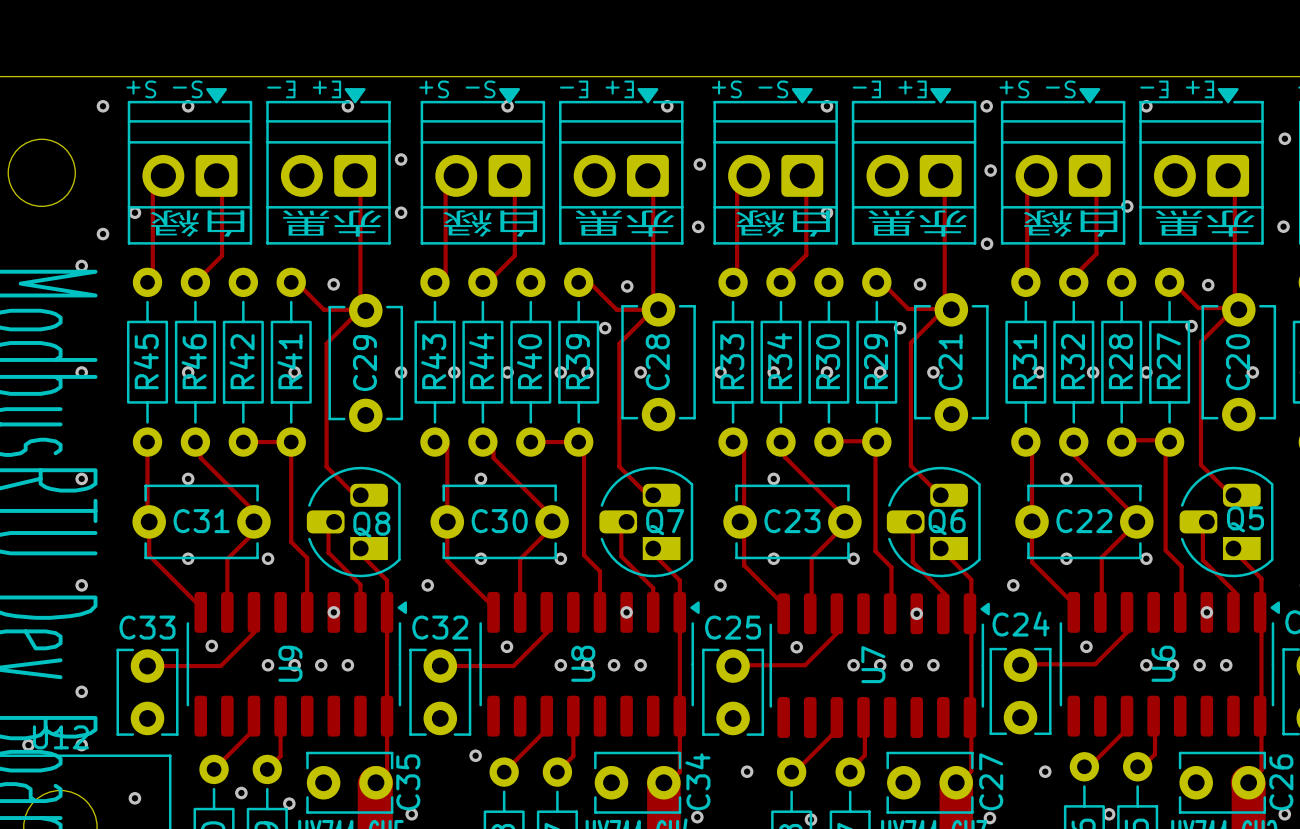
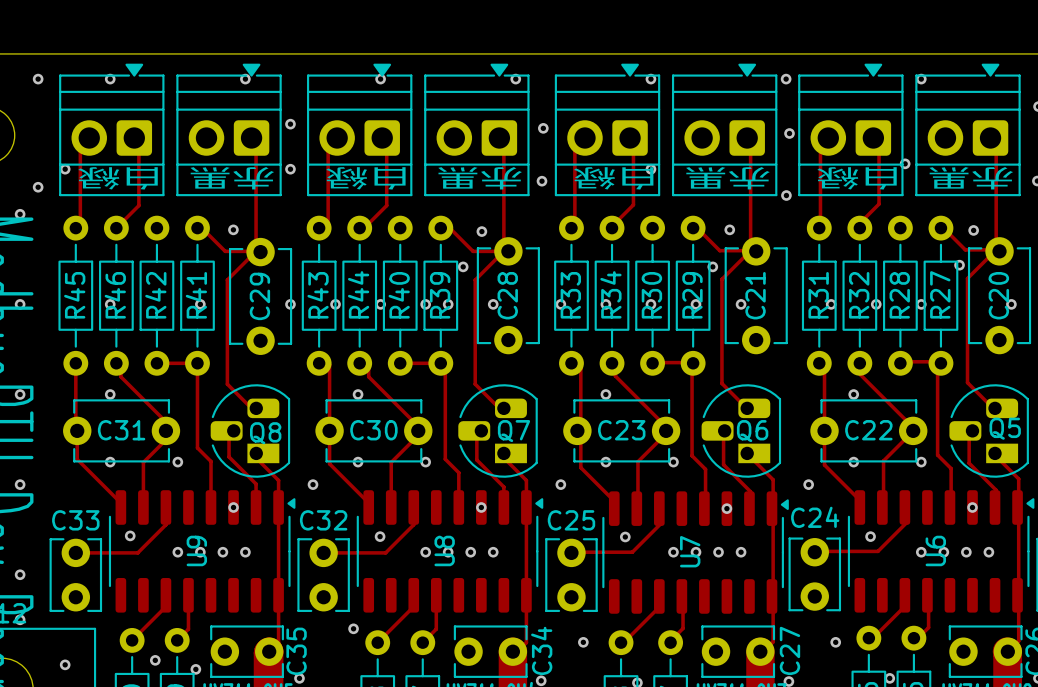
text: E+ E- S- S+ (233, 89) -> none
text: E+ E- S- S+ (526, 89) -> none
text: E+ E- S- S+ (819, 89) -> none
text: E+ E- S- S+ (1106, 89) -> none

